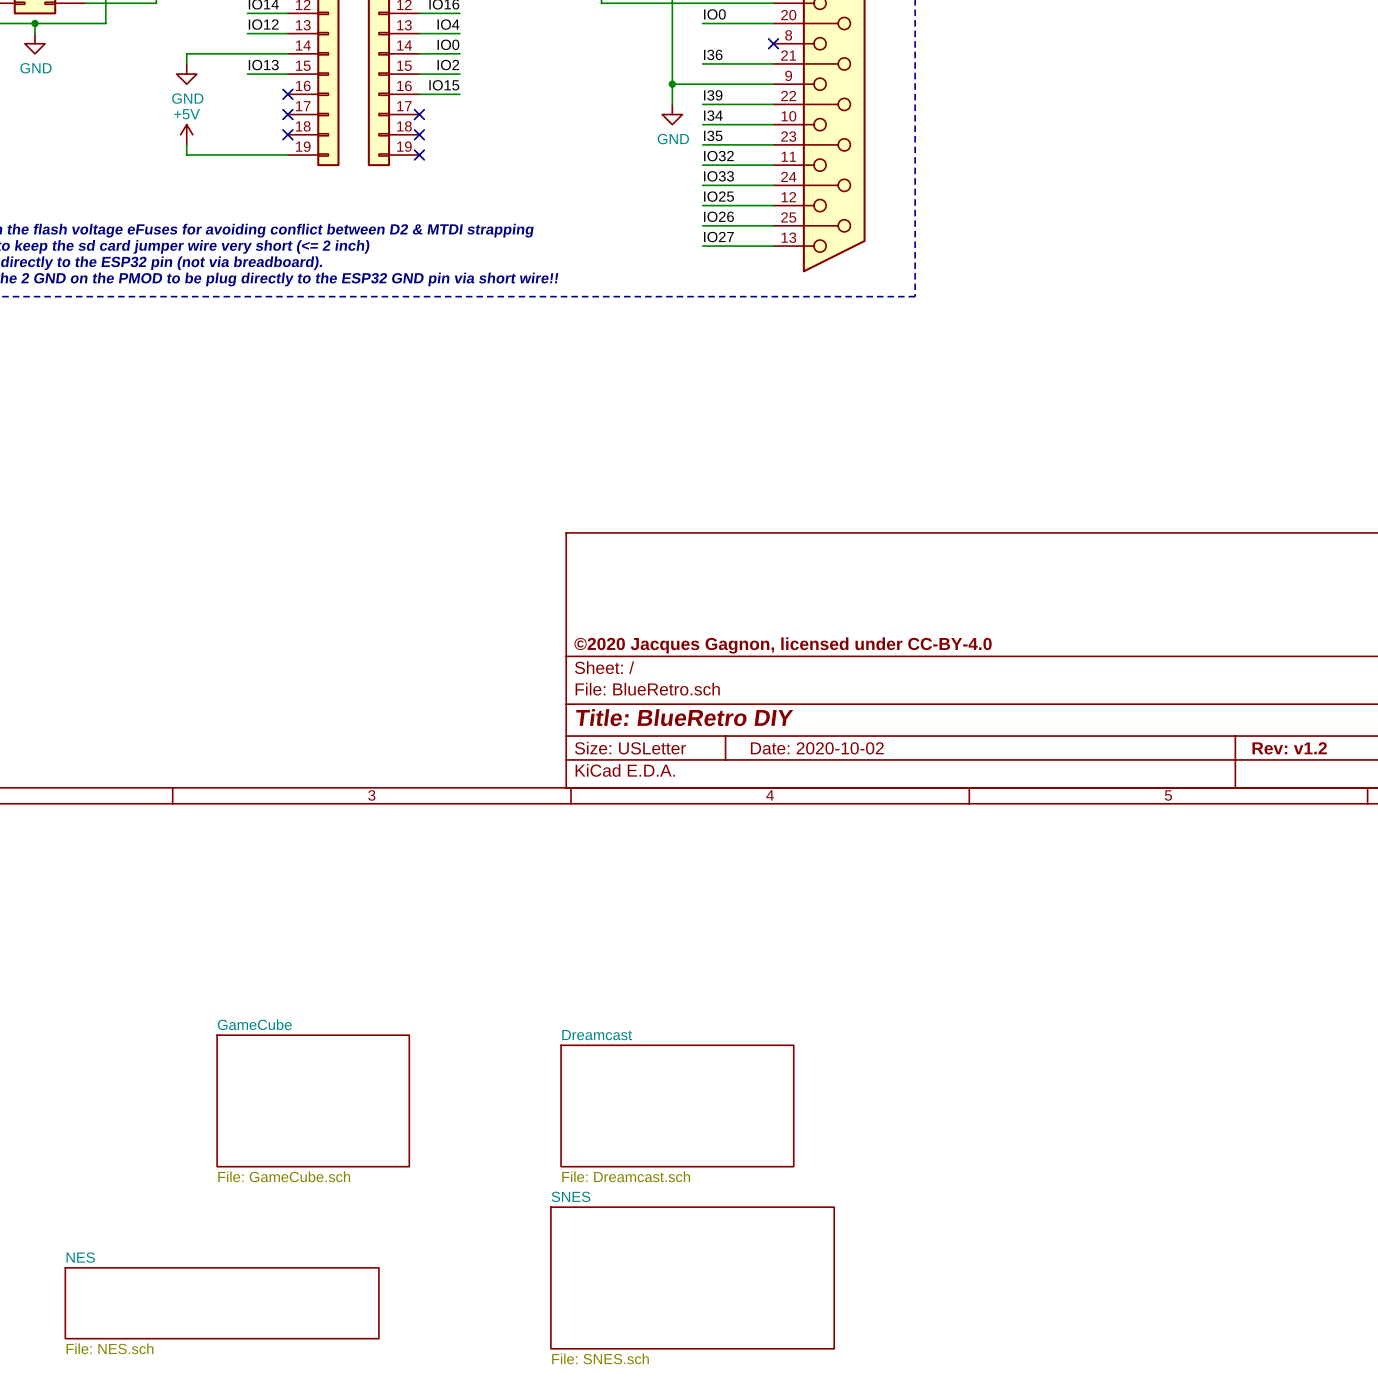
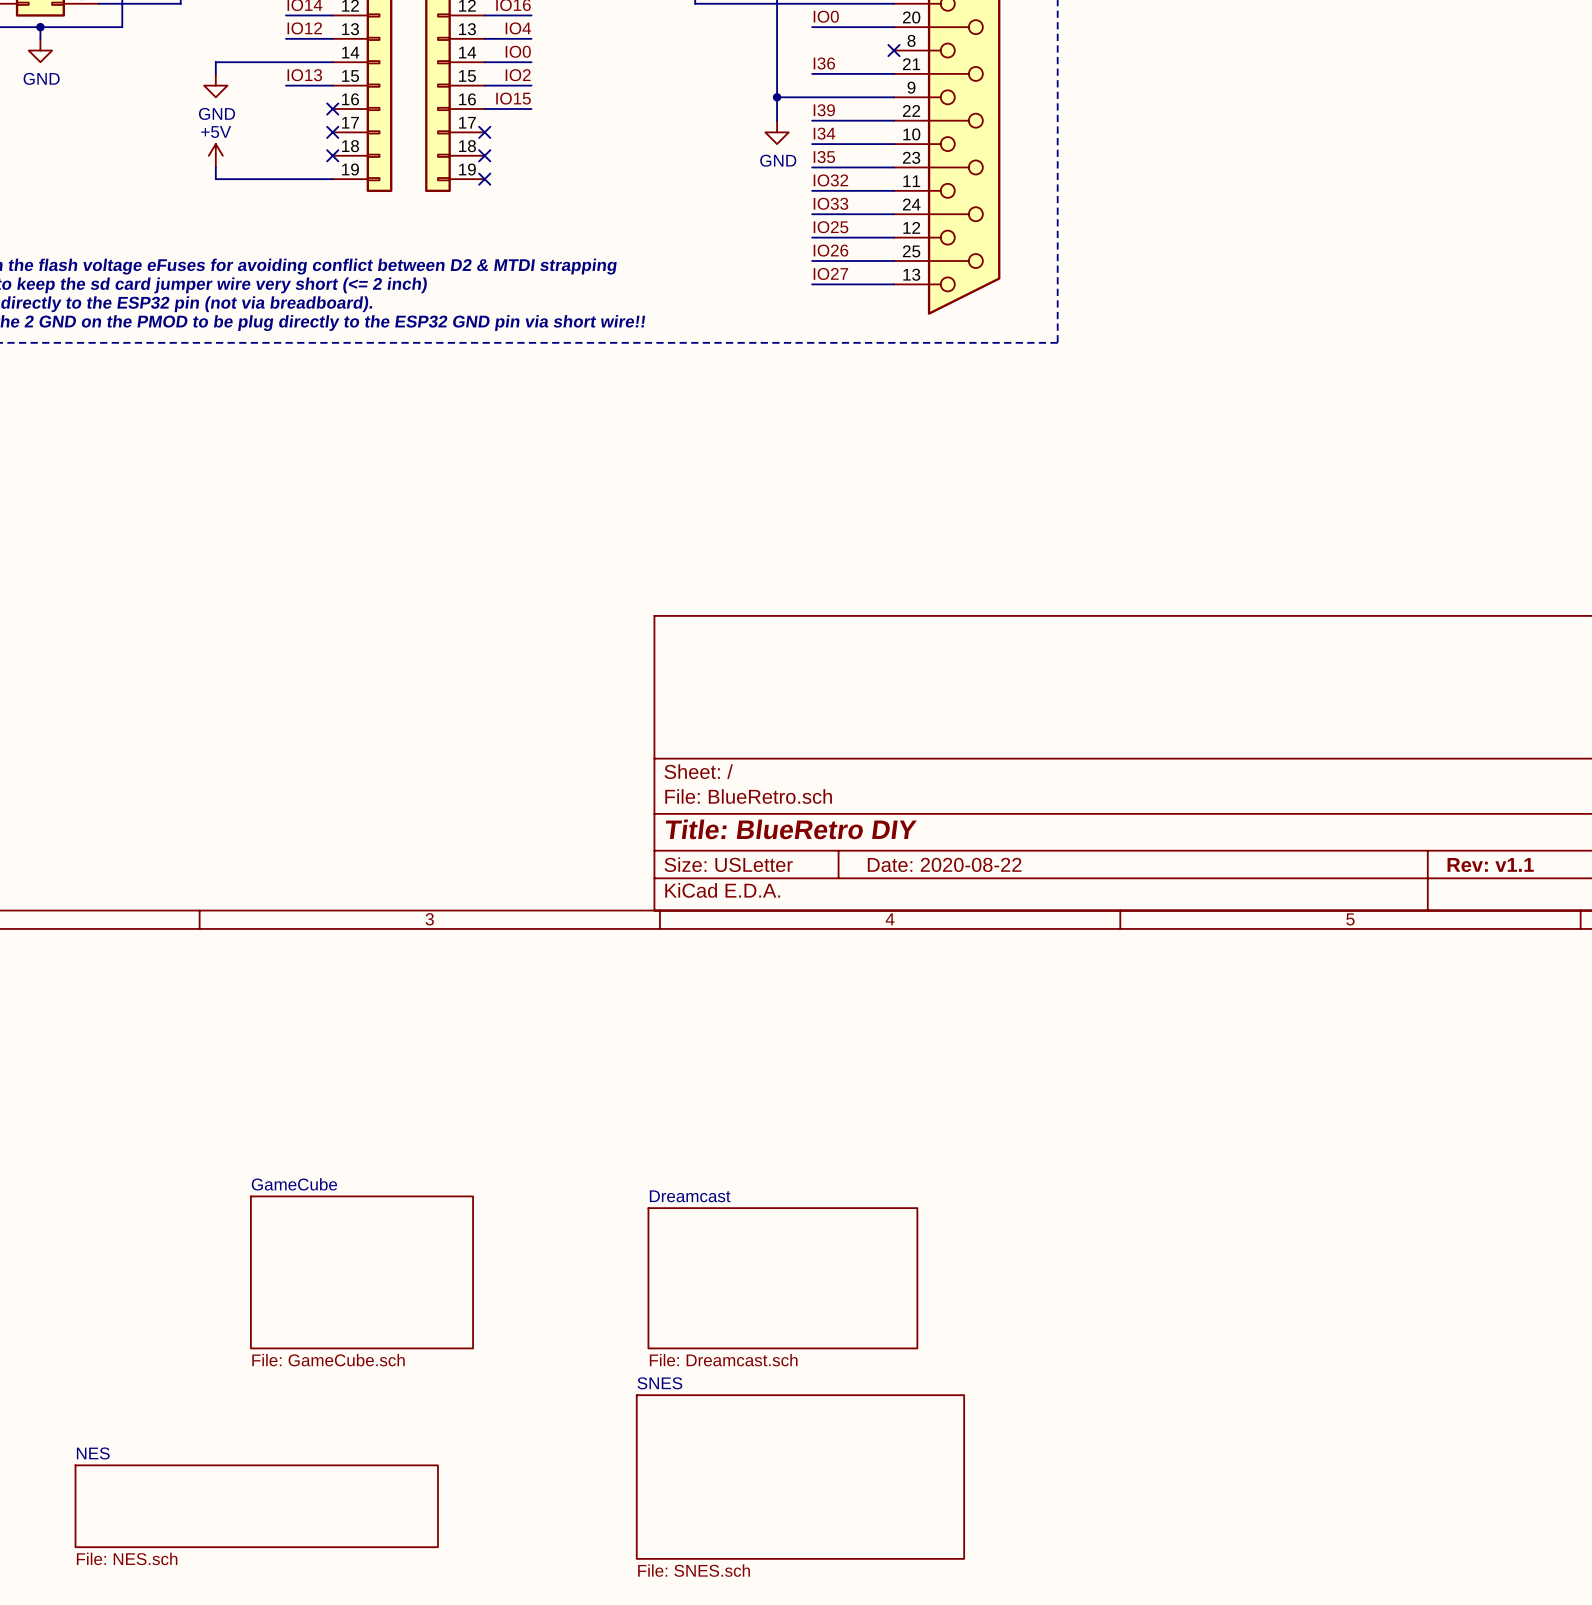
title block: ©2020 Jacques Gagnon, licensed under CC-BY-4.0 (783, 645) -> none
title block: Date: 2020-10-02 (817, 748) -> Date: 2020-08-22 (944, 864)
title block: Rev: v1.2 (1289, 748) -> Rev: v1.1 (1490, 865)

